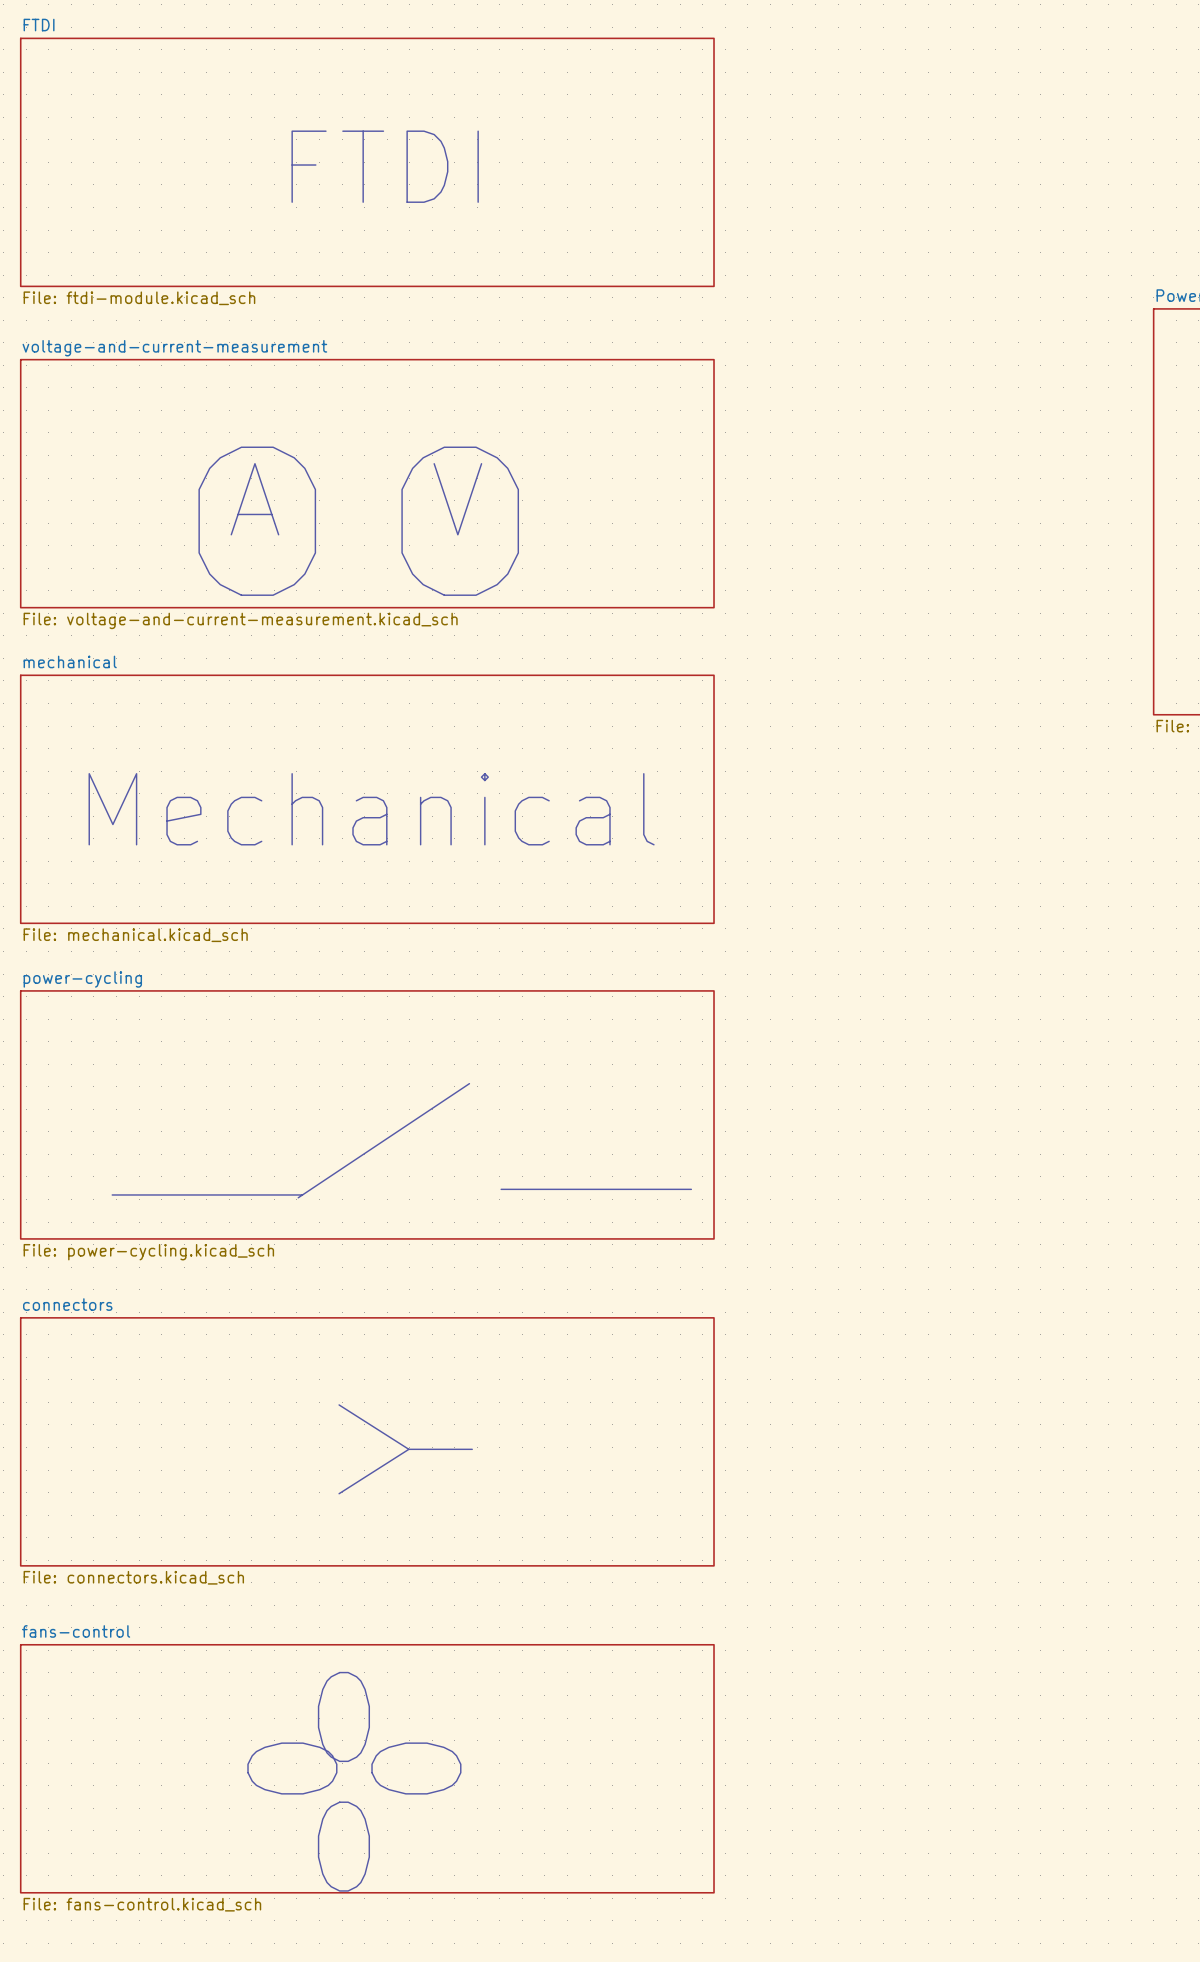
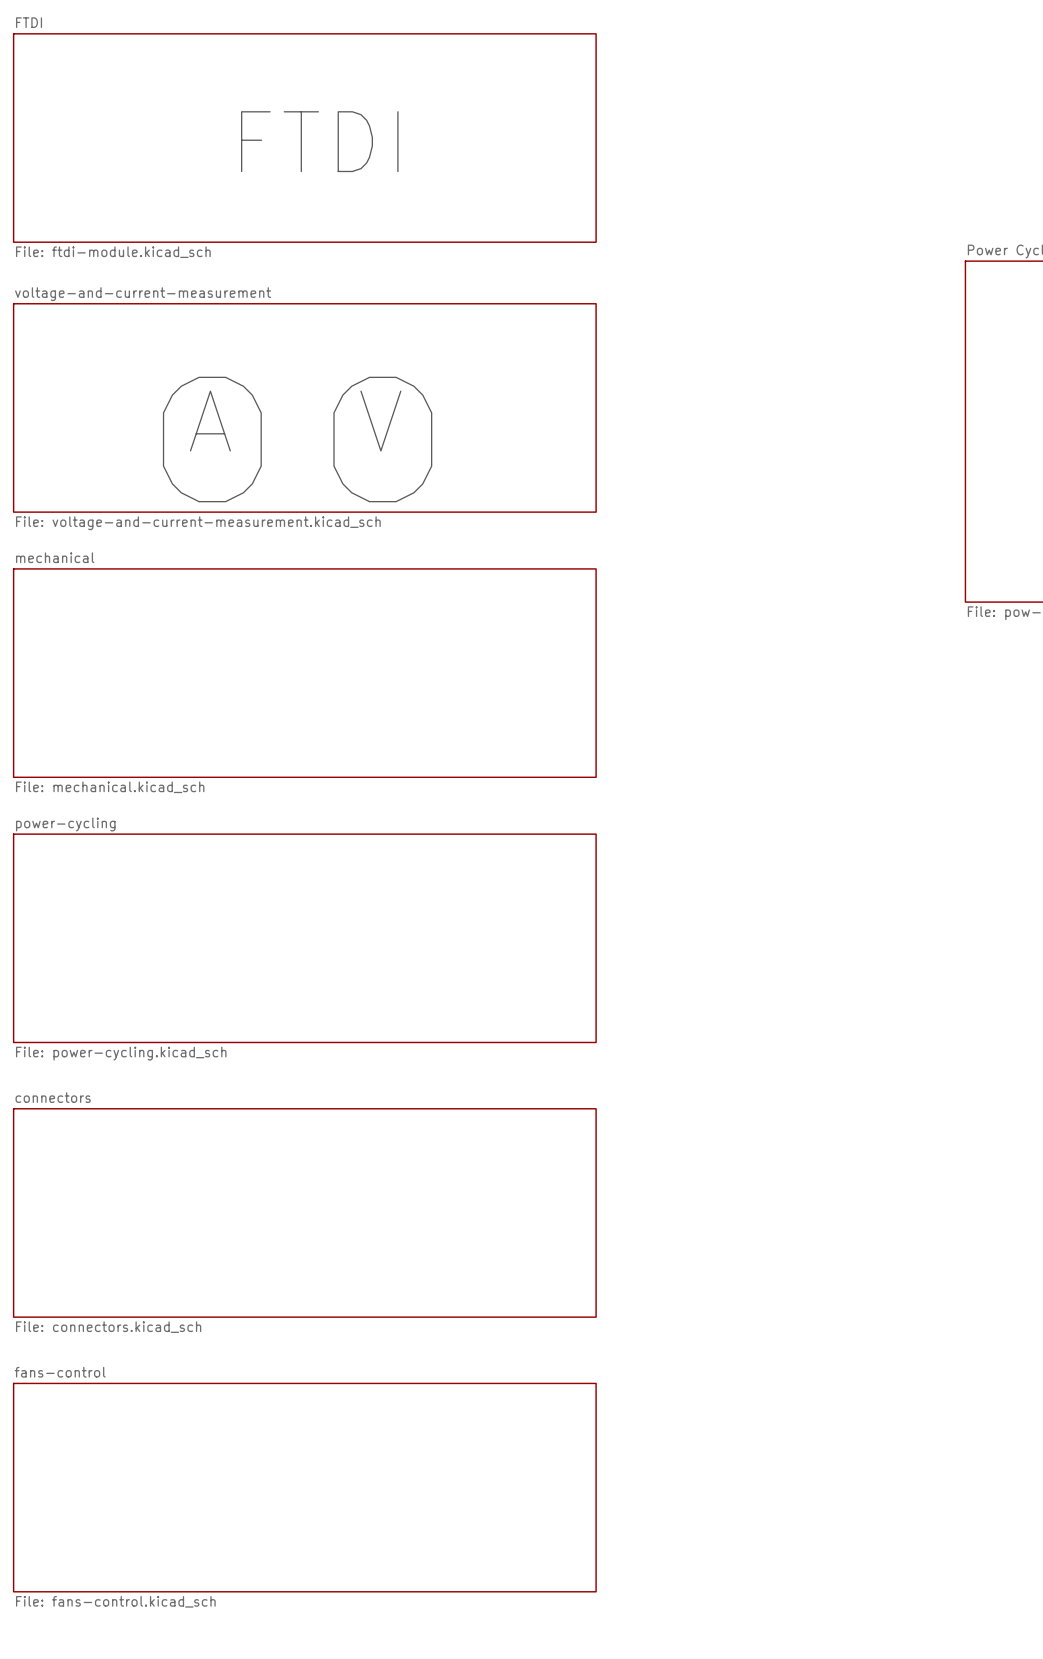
text: Mechanical (371, 809) -> none
text: \ (383, 1140) -> none
text: | (596, 1189) -> none
text: | (207, 1194) -> none
text: Y (405, 1449) -> none
text: 0 (343, 1716) -> none
text: 0 (292, 1768) -> none
text: 0 (416, 1768) -> none
text: 0 (343, 1846) -> none

